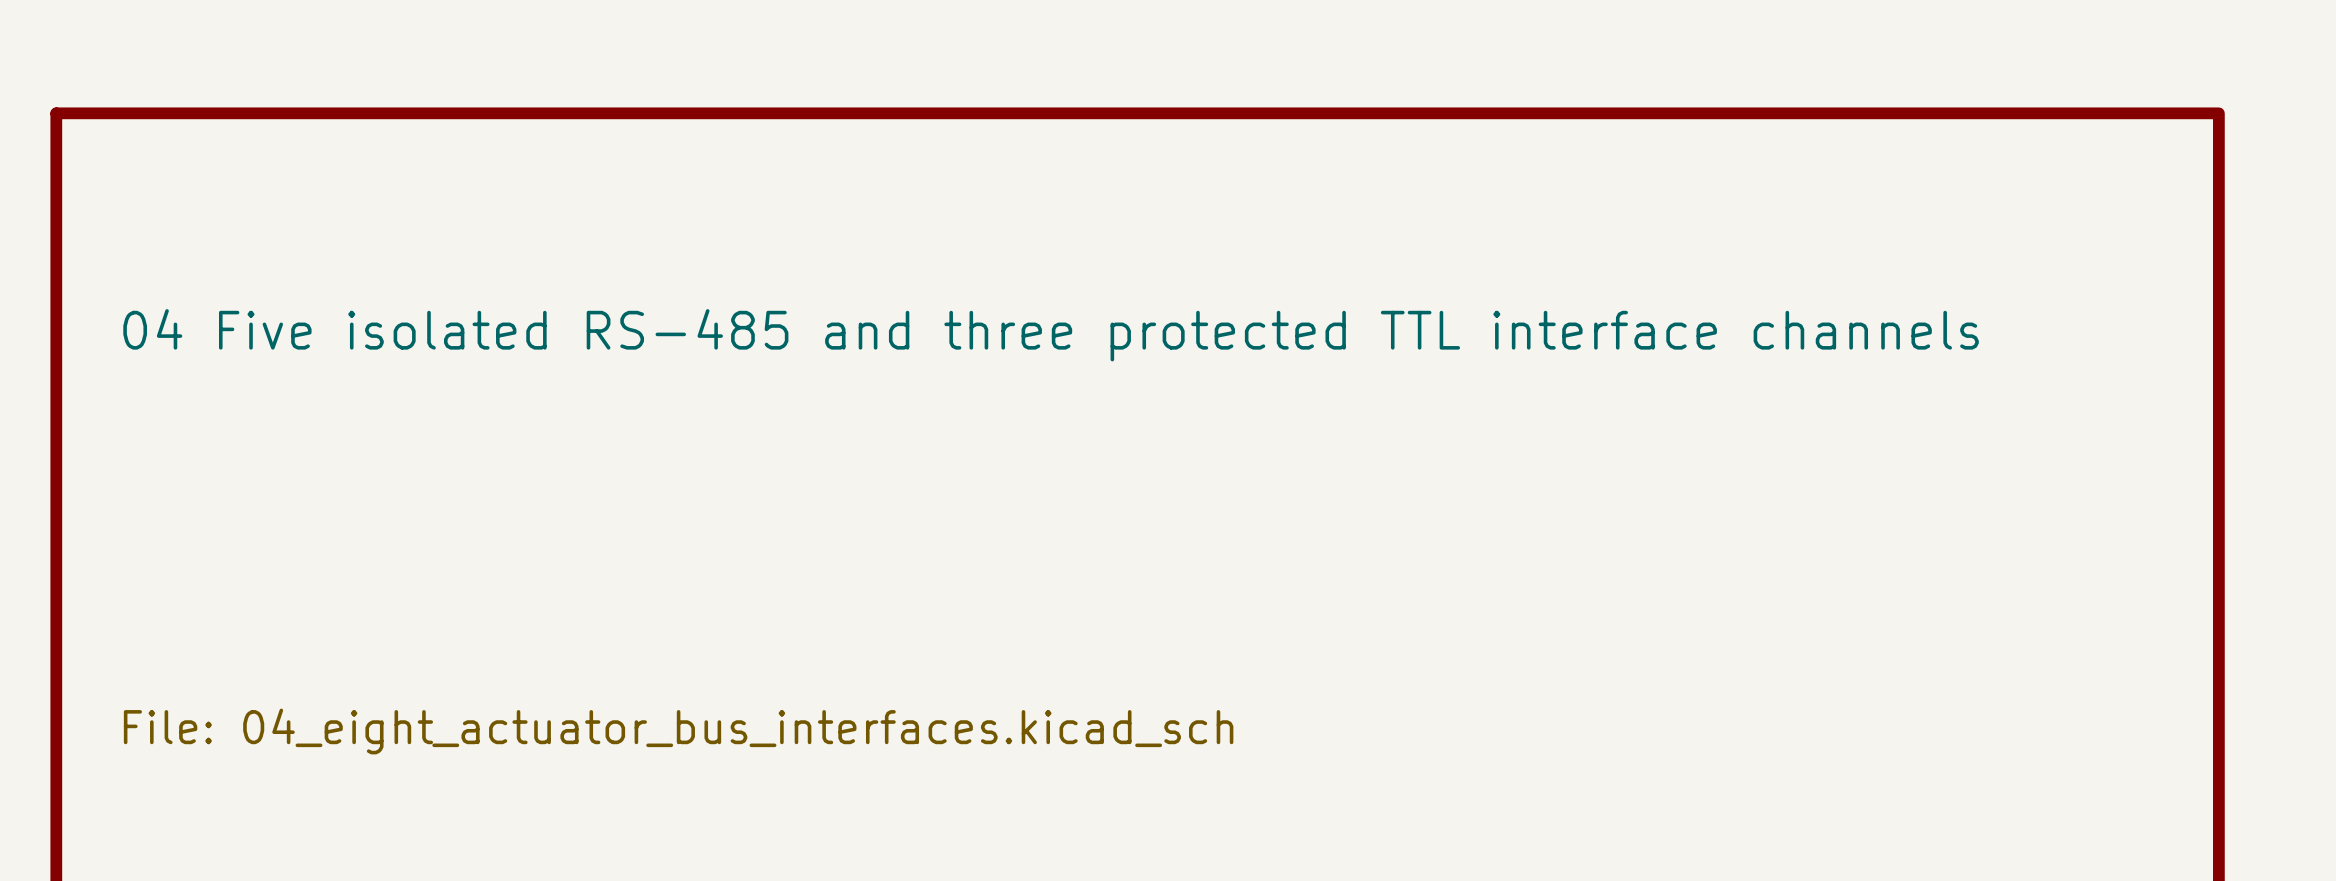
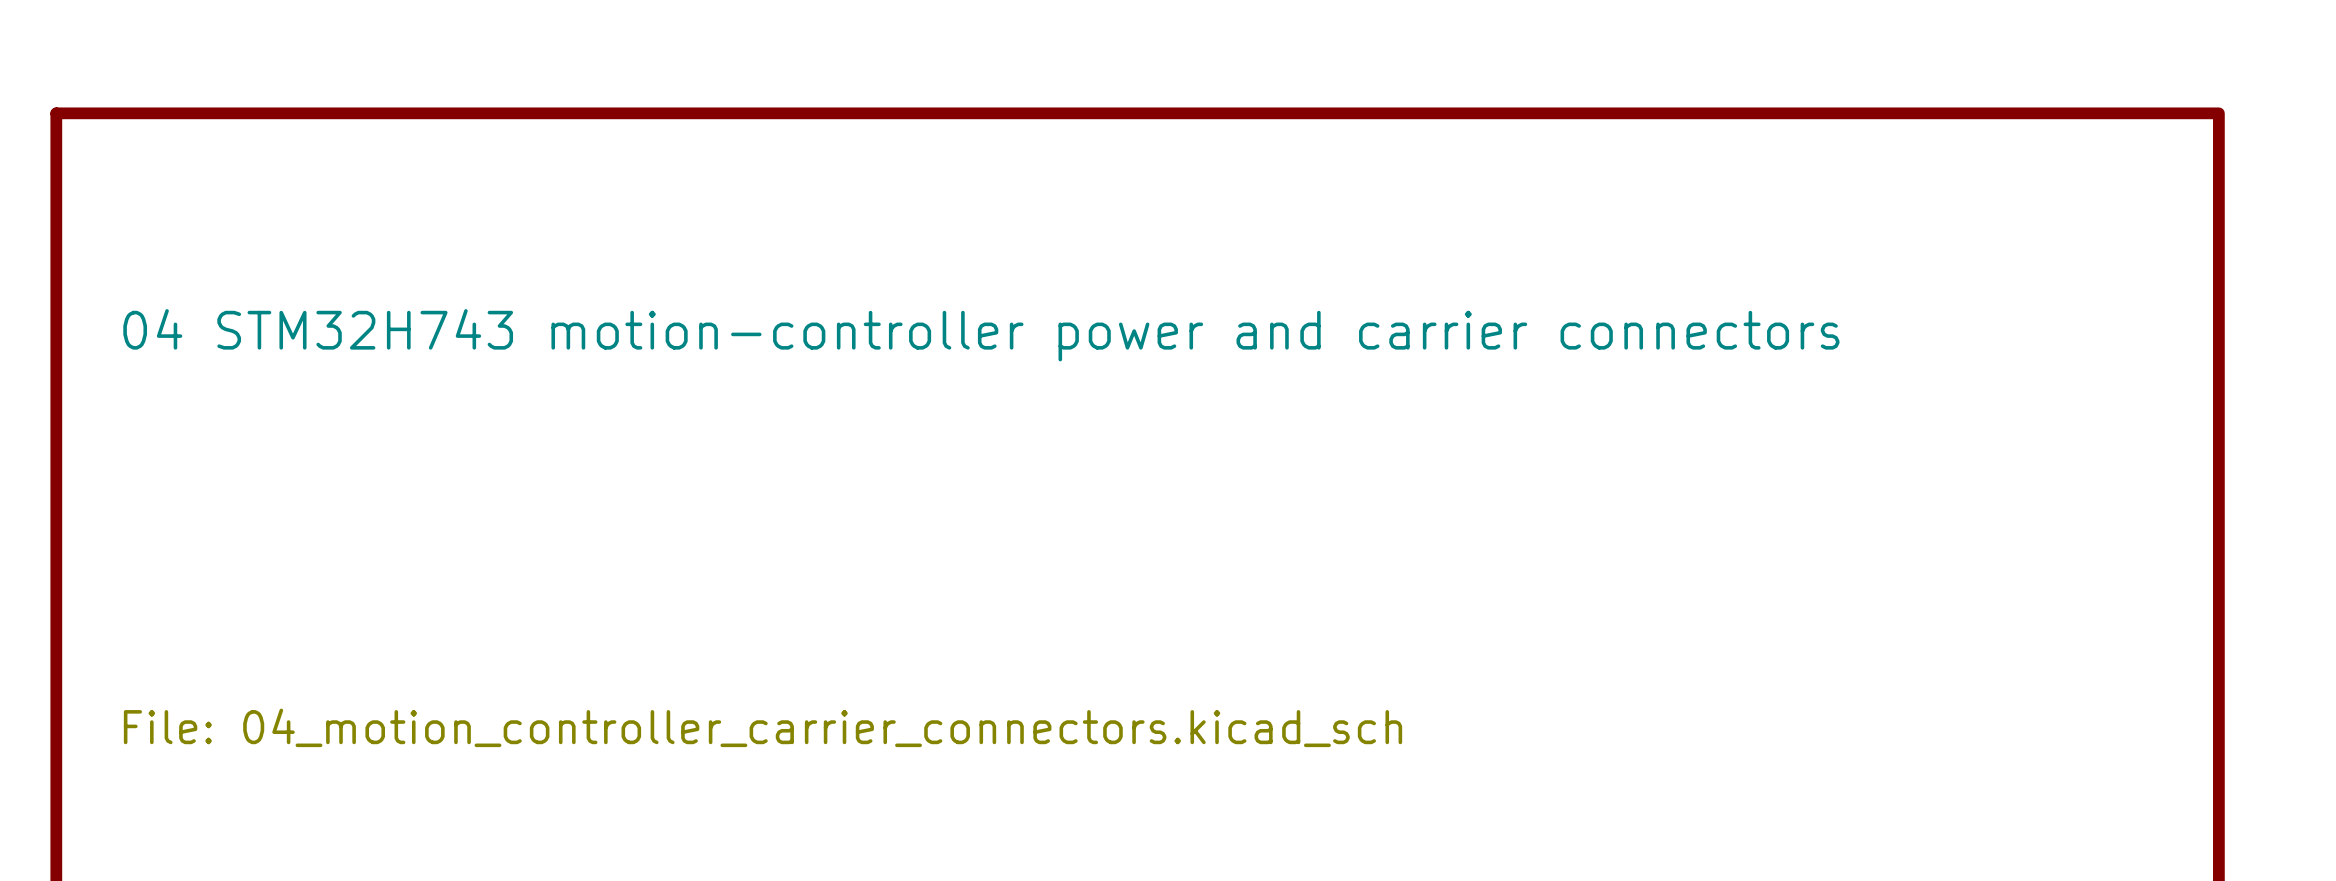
sheet 04 Five isolated RS-485 and three protected TTL interface channels name: 04 Five isolated RS-485 and three protected TTL interface channels (1051, 335) -> 04 STM32H743 motion-controller power and carrier connectors (981, 335)
sheet 04 Five isolated RS-485 and three protected TTL interface channels value: File: 04_eight_actuator_bus_interfaces.kicad_sch (678, 731) -> File: 04_motion_controller_carrier_connectors.kicad_sch (763, 727)

